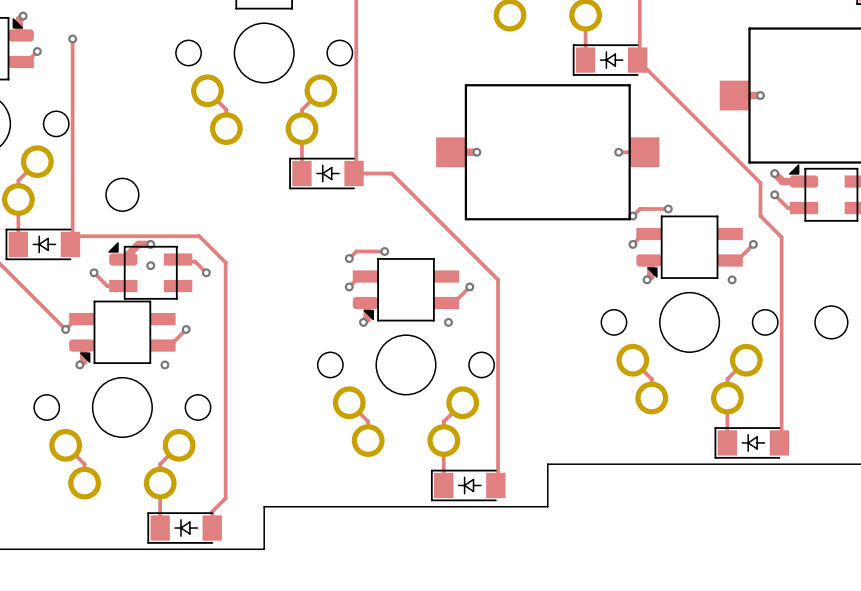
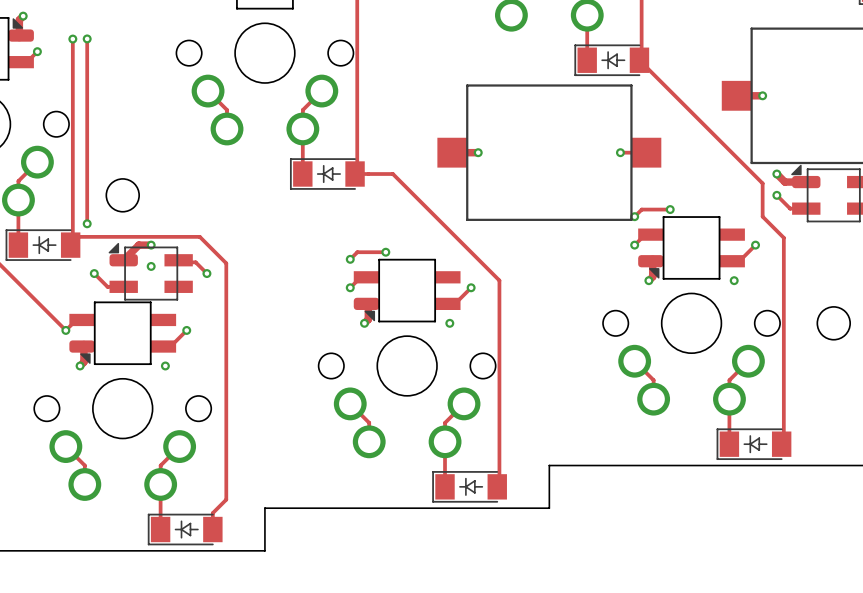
track: none -> (87, 38) (87, 223)
via: none -> (87, 38)
via: none -> (87, 223)

